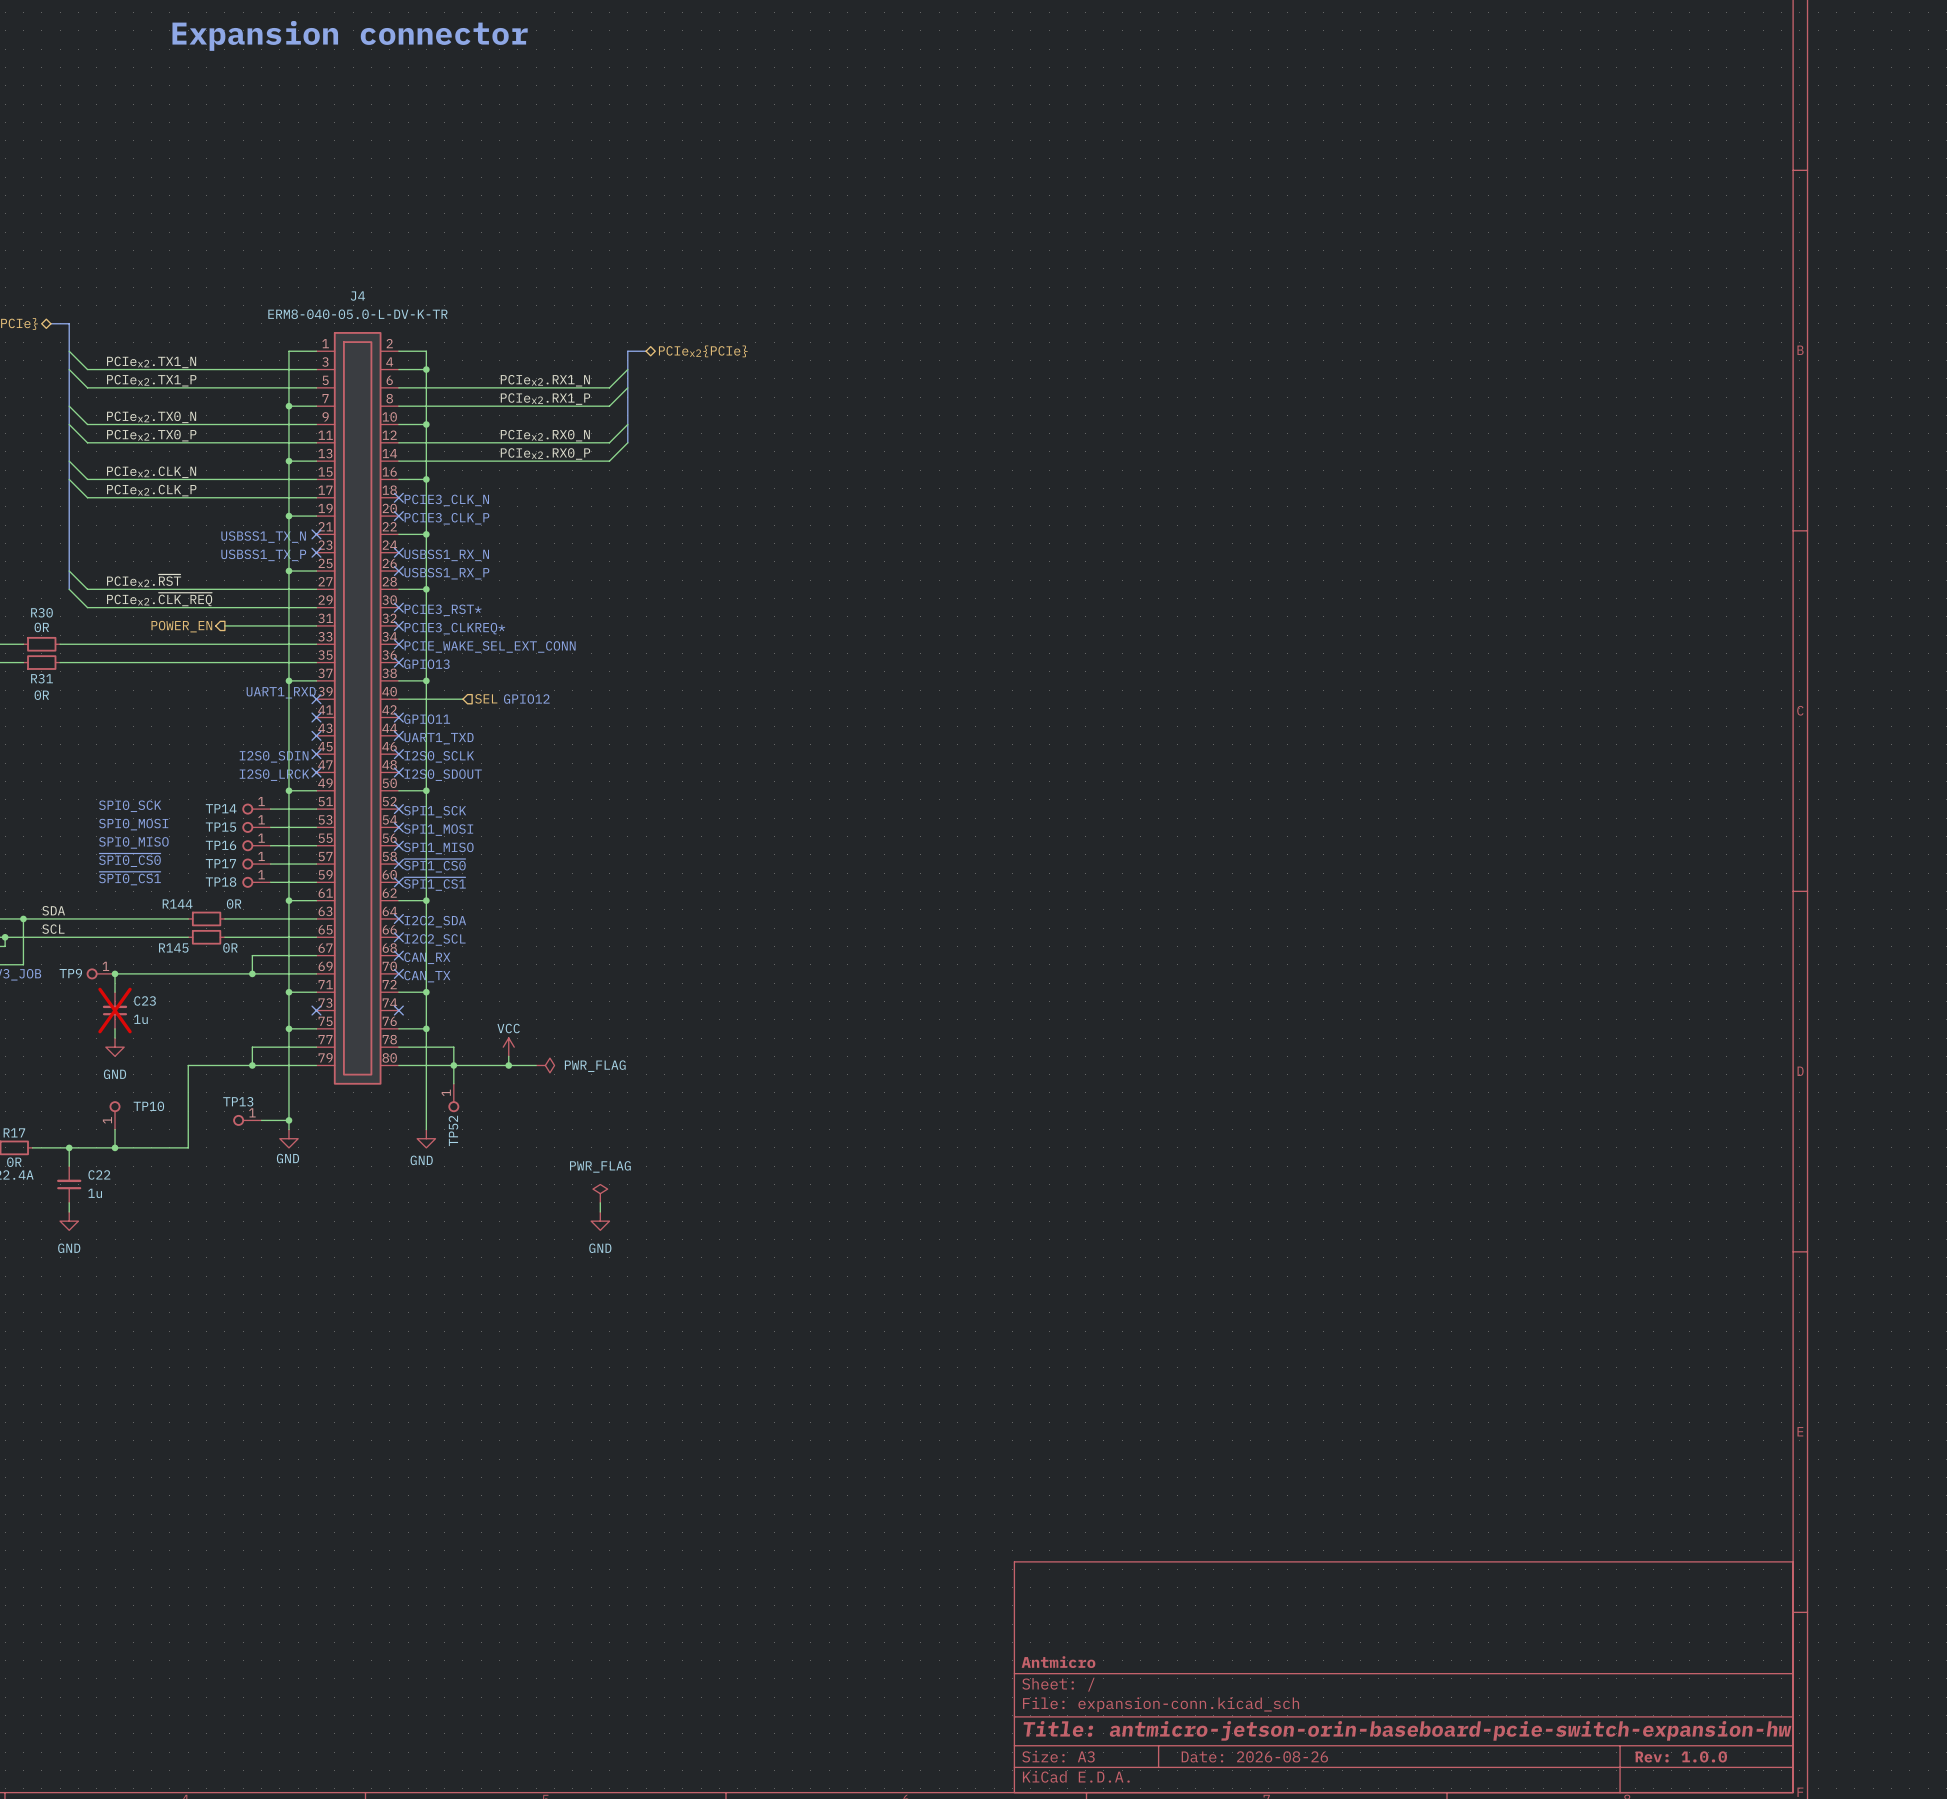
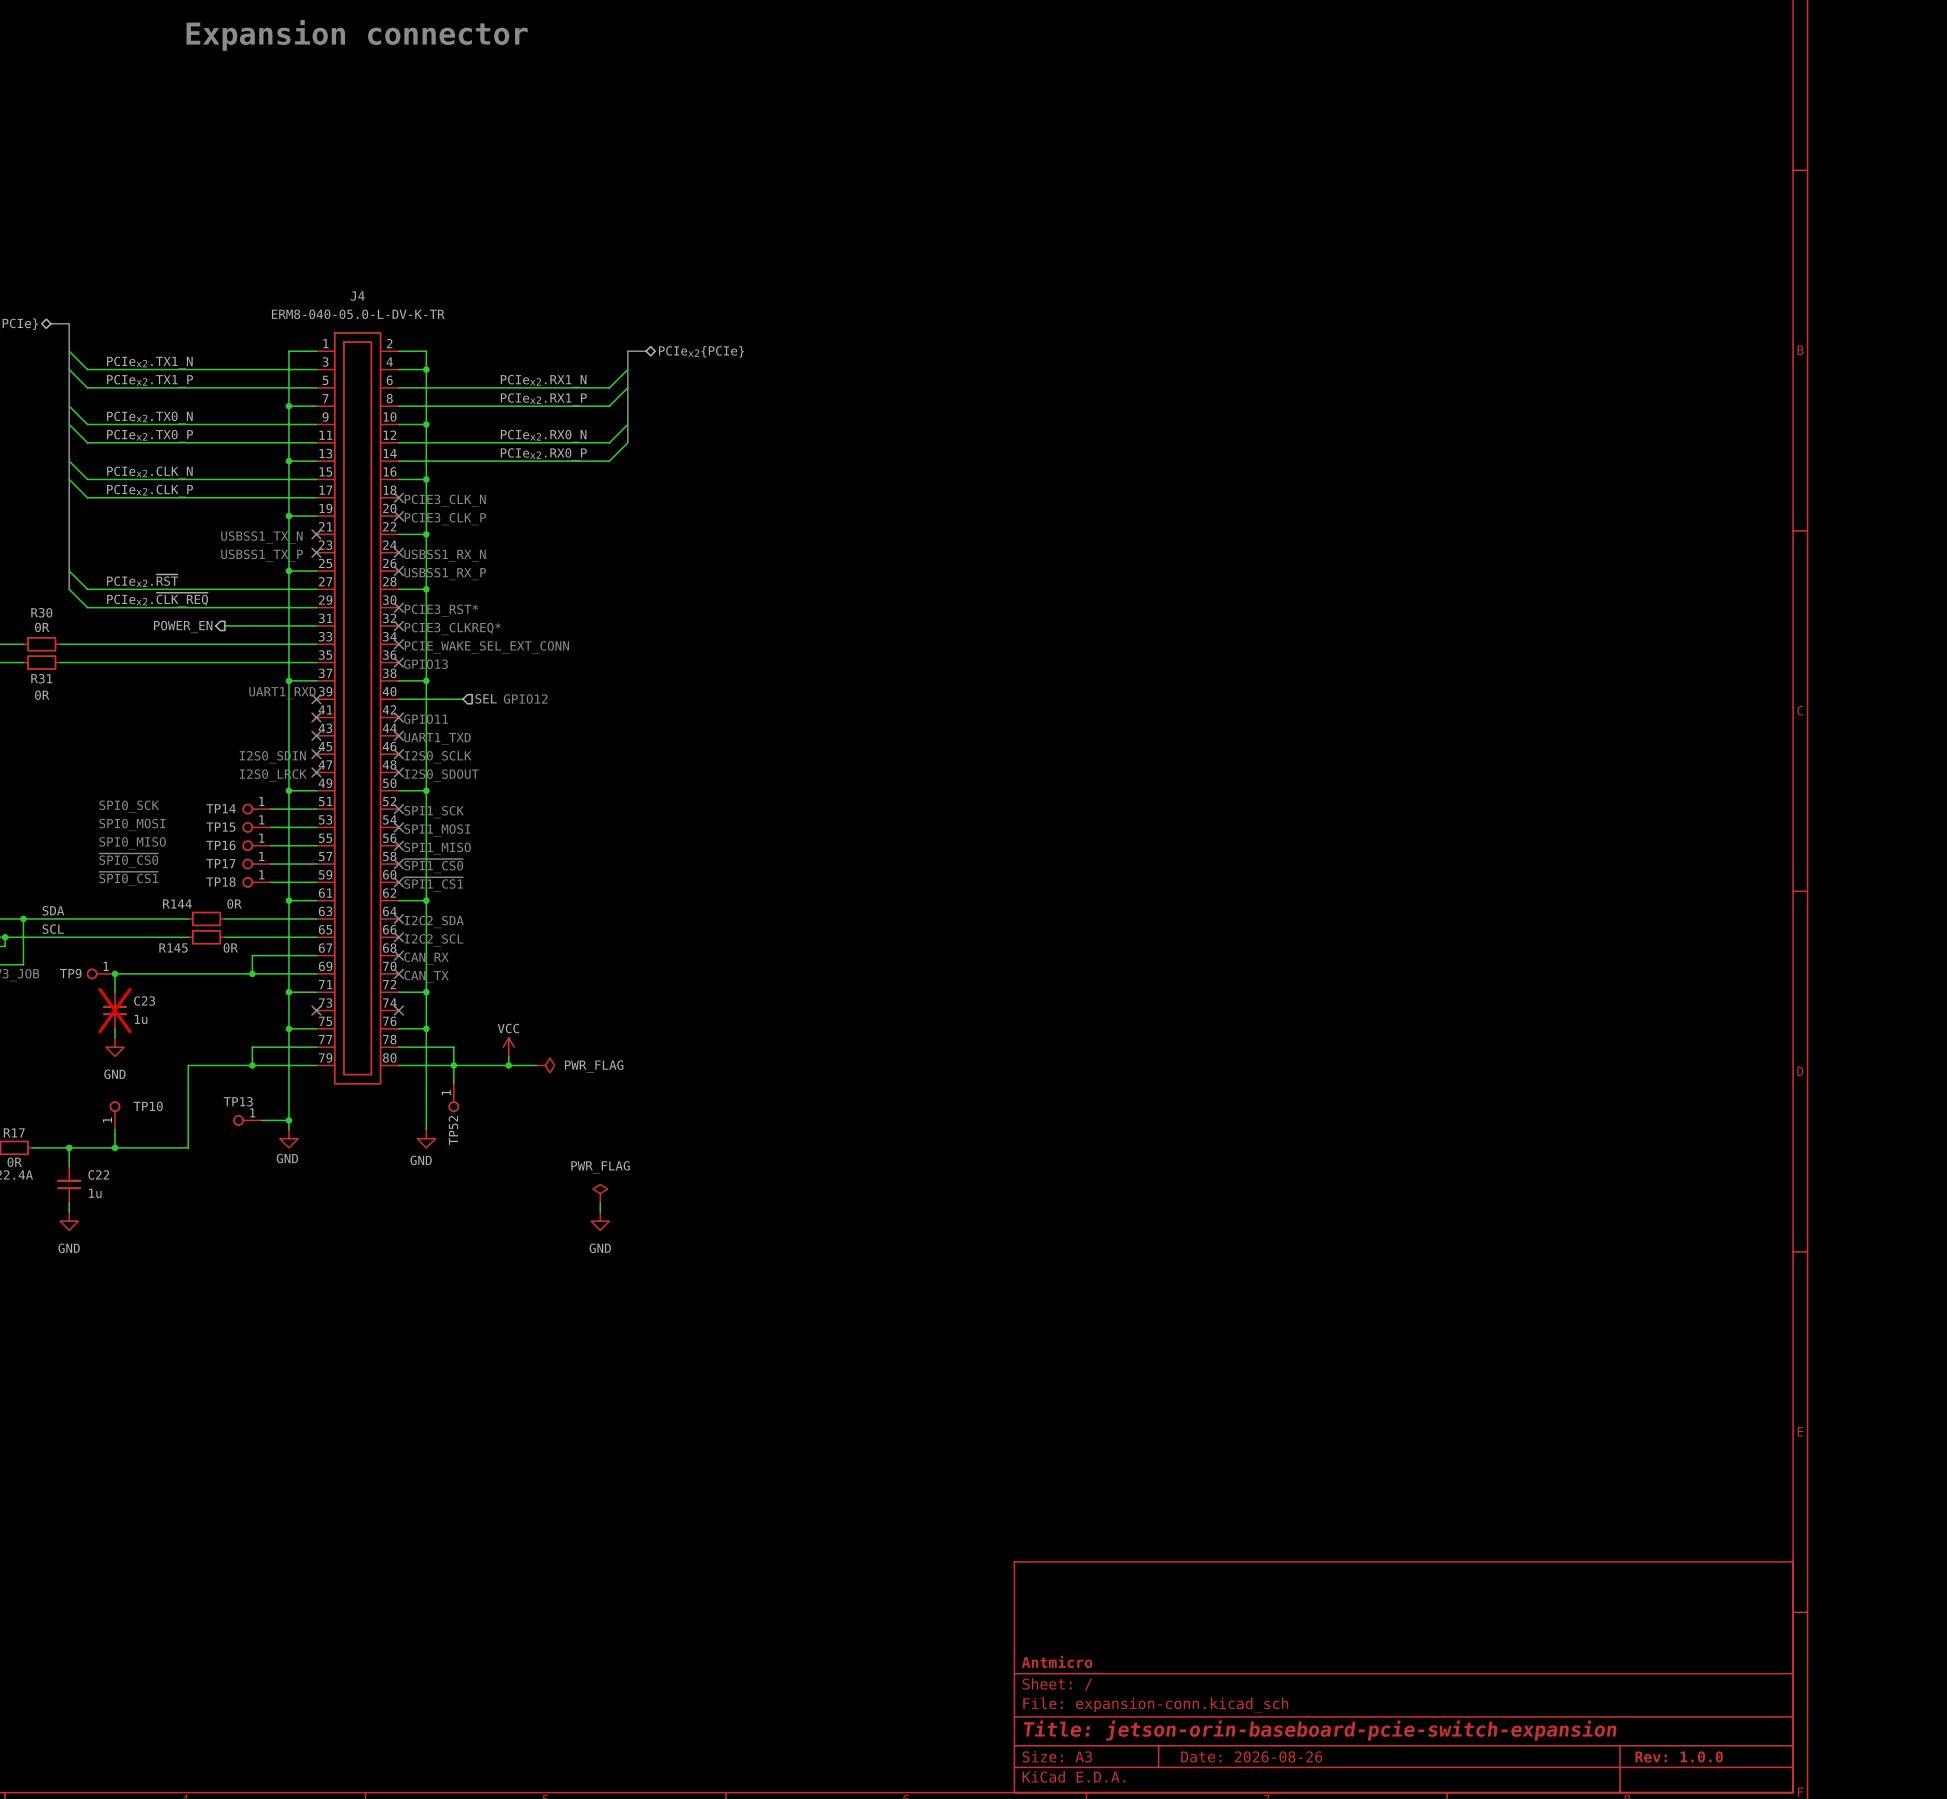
title block: Title: antmicro-jetson-orin-baseboard-pcie-switch-expansion-hw (1407, 1730) -> Title: jetson-orin-baseboard-pcie-switch-expansion (1320, 1730)

